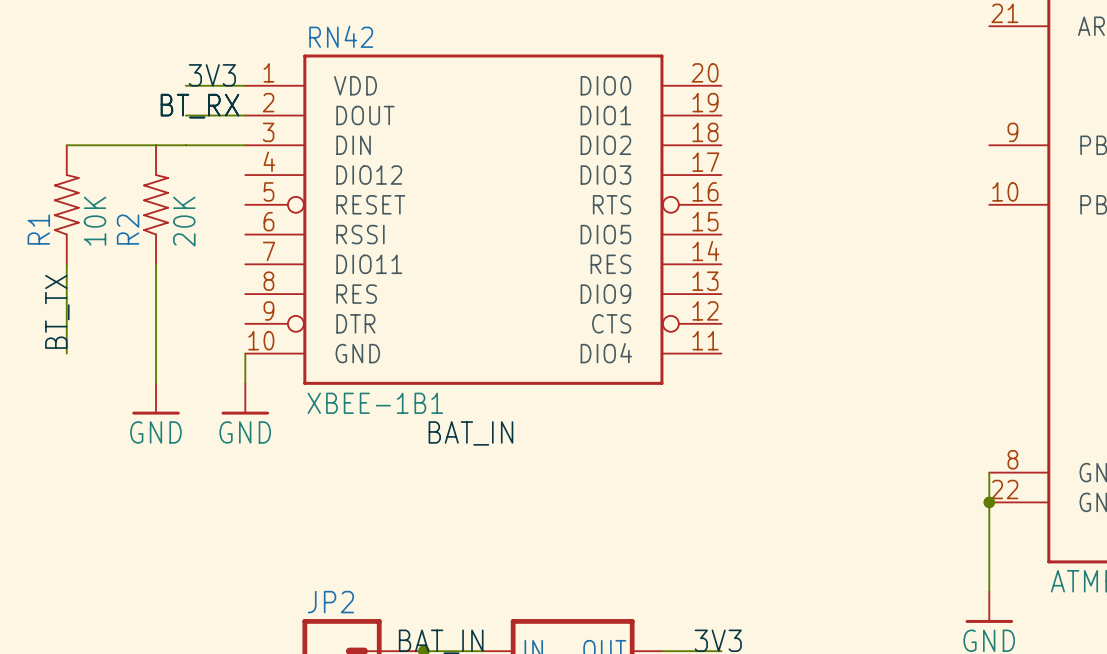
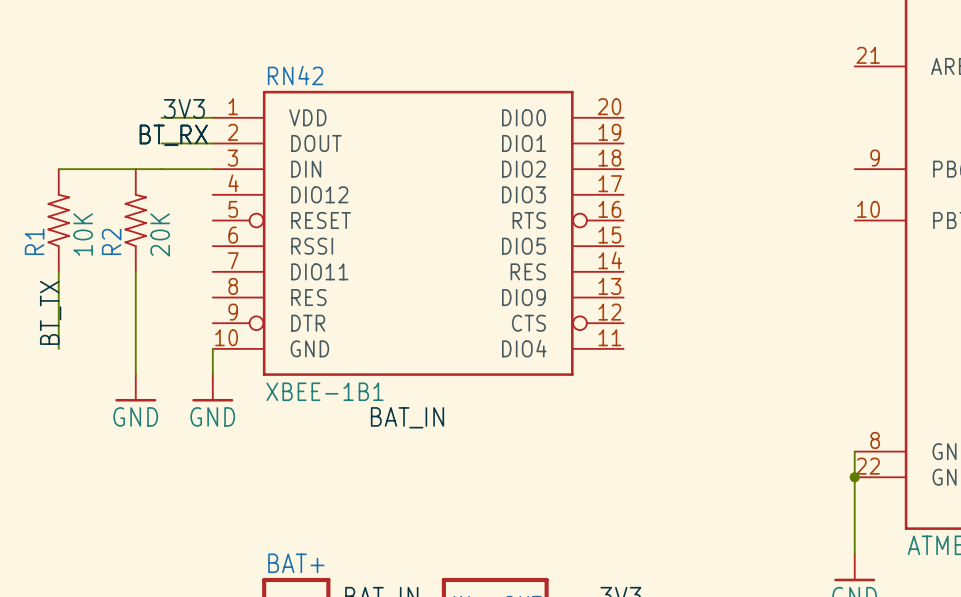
JP2 name: JP2 (330, 602) -> BAT+ (296, 563)

